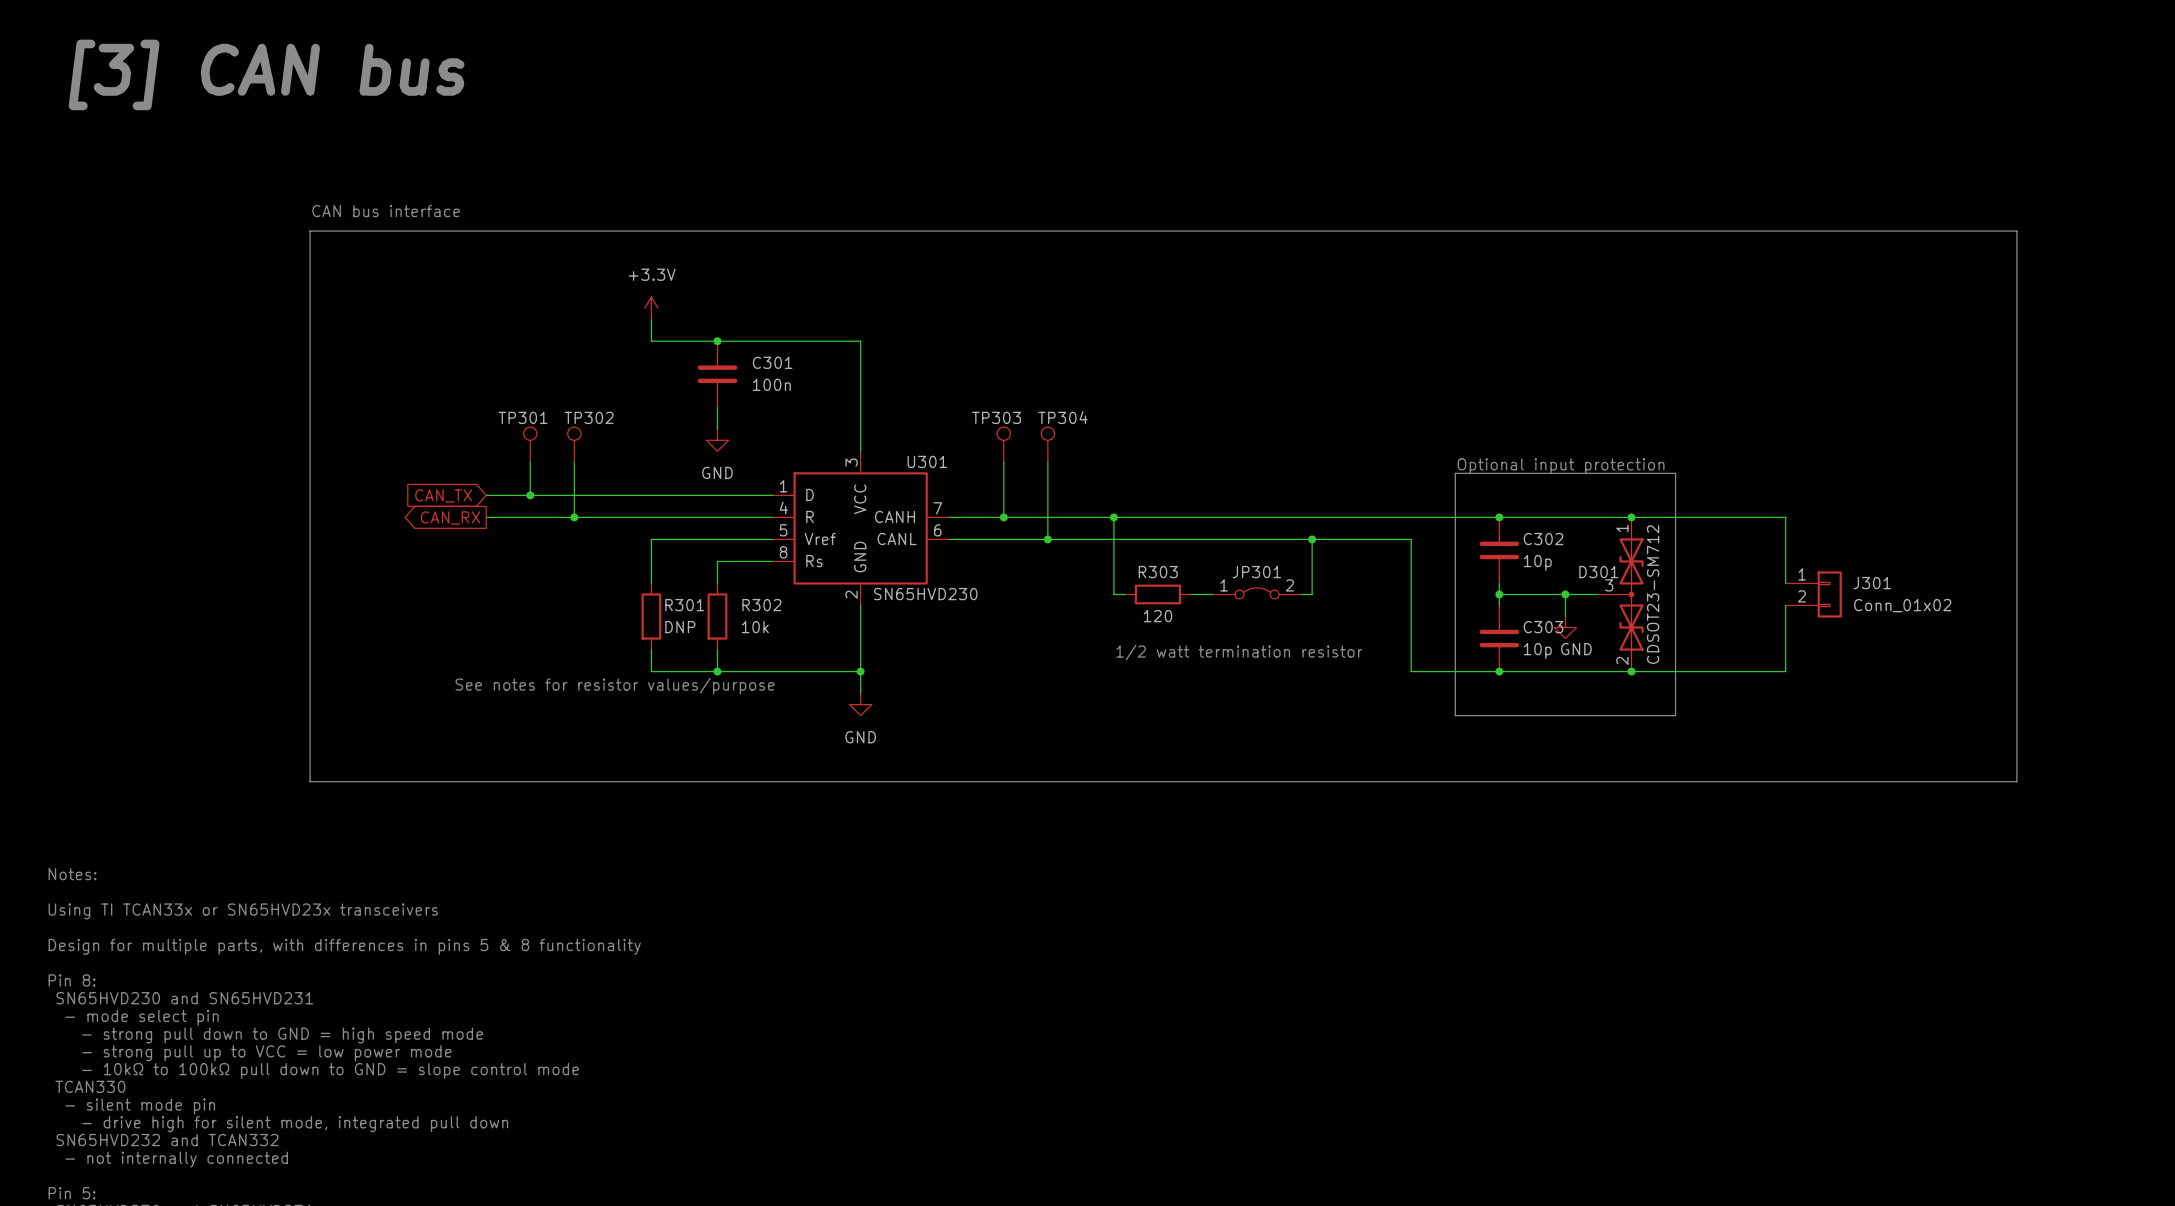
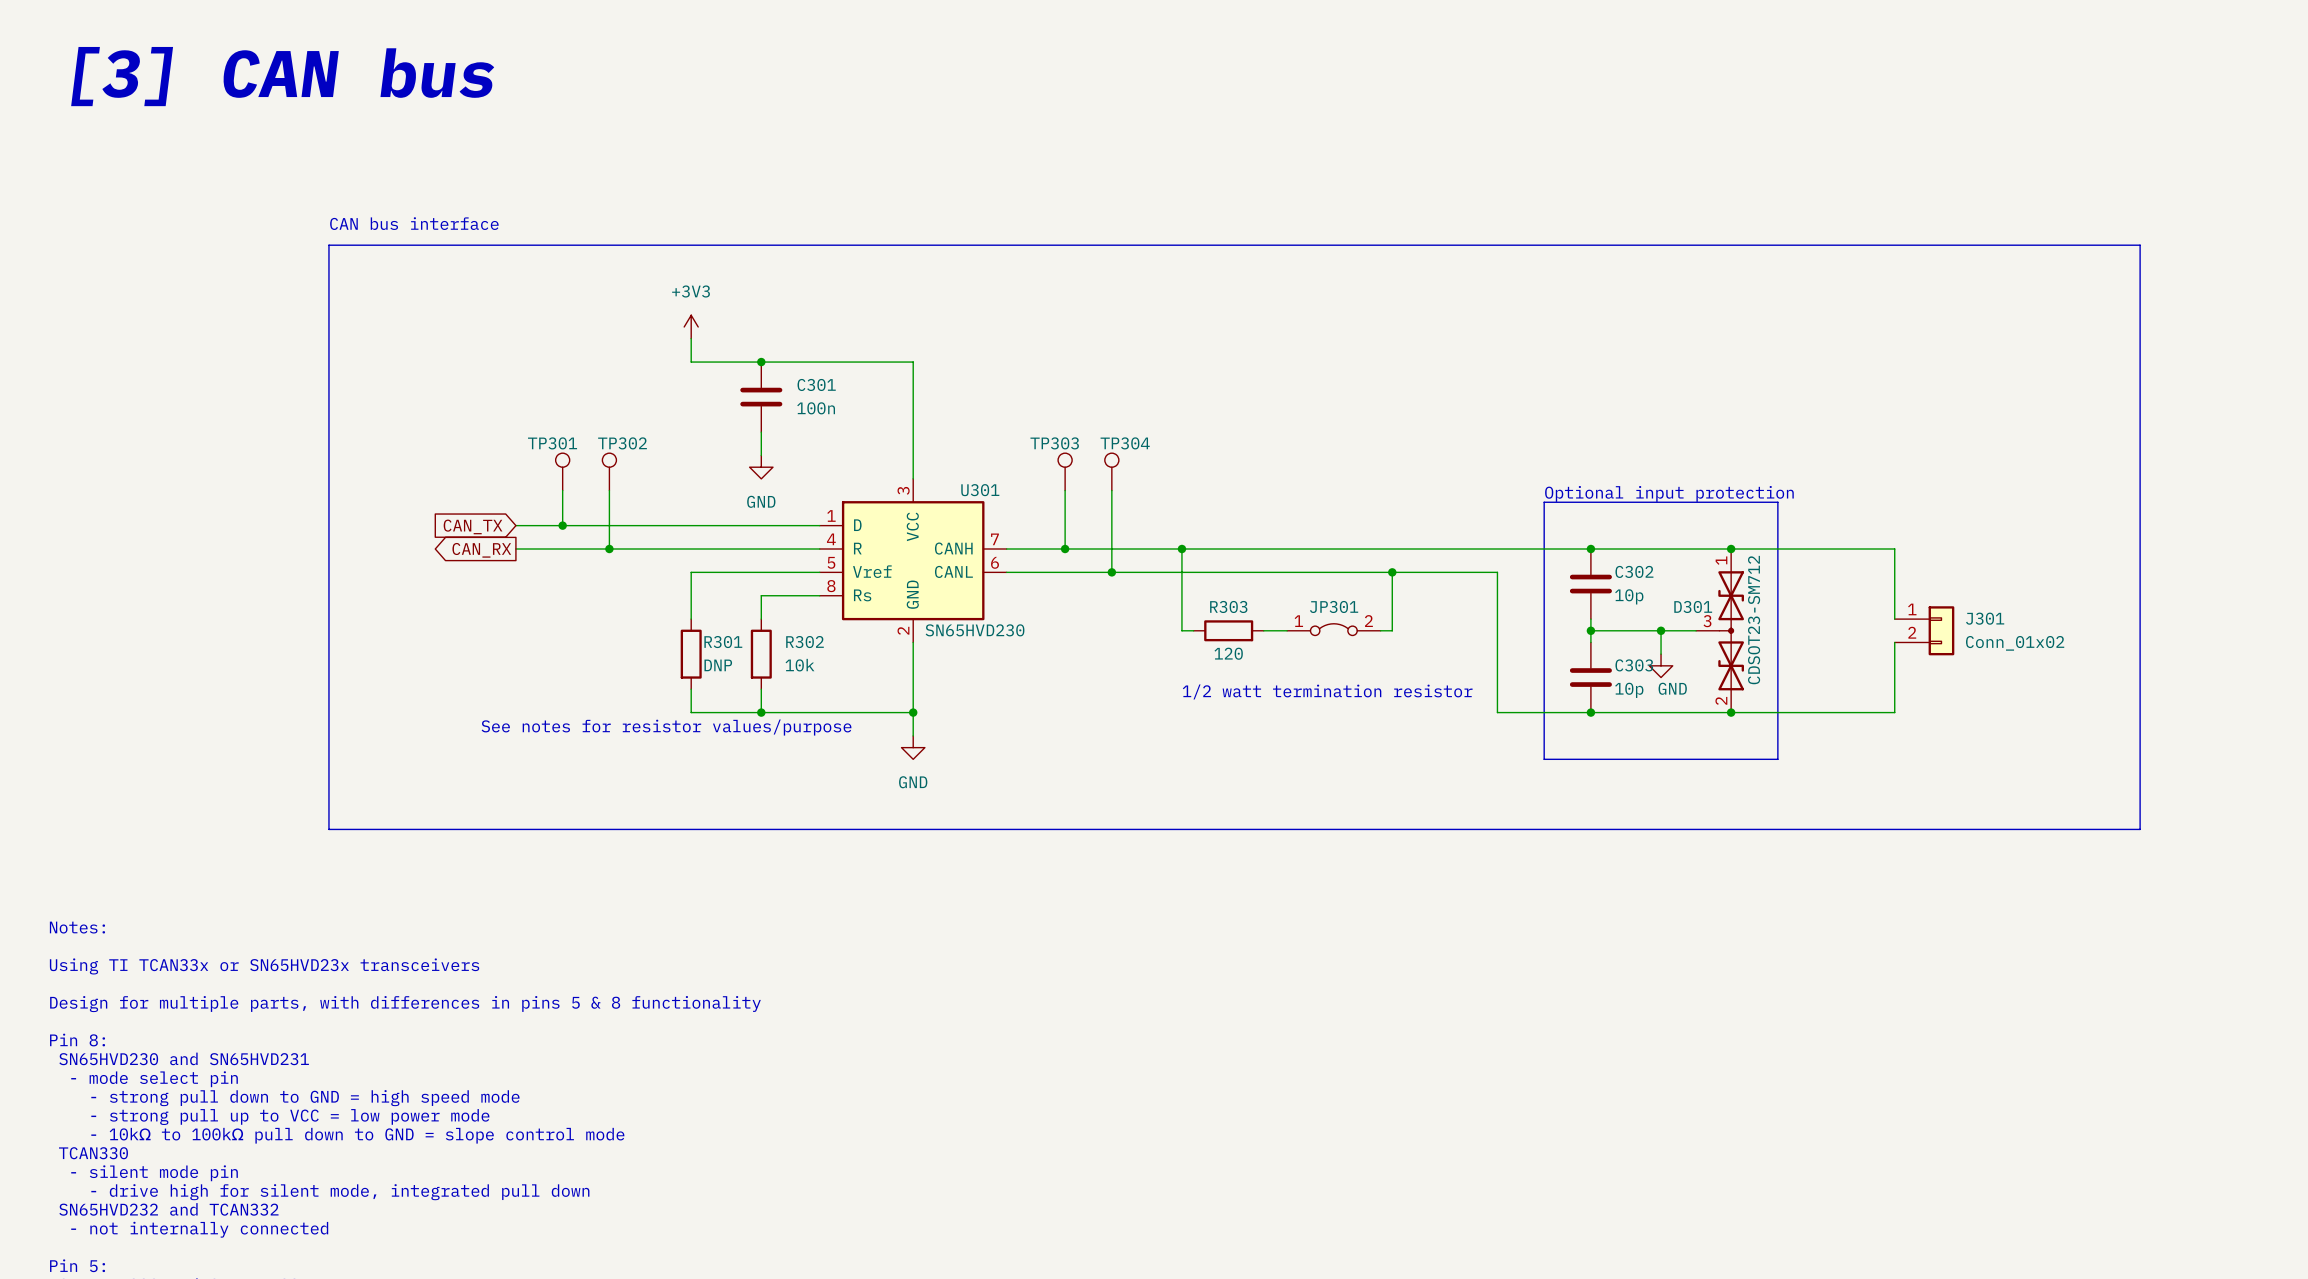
power symbol: +3.3V (651, 308) -> +3V3 (691, 326)

